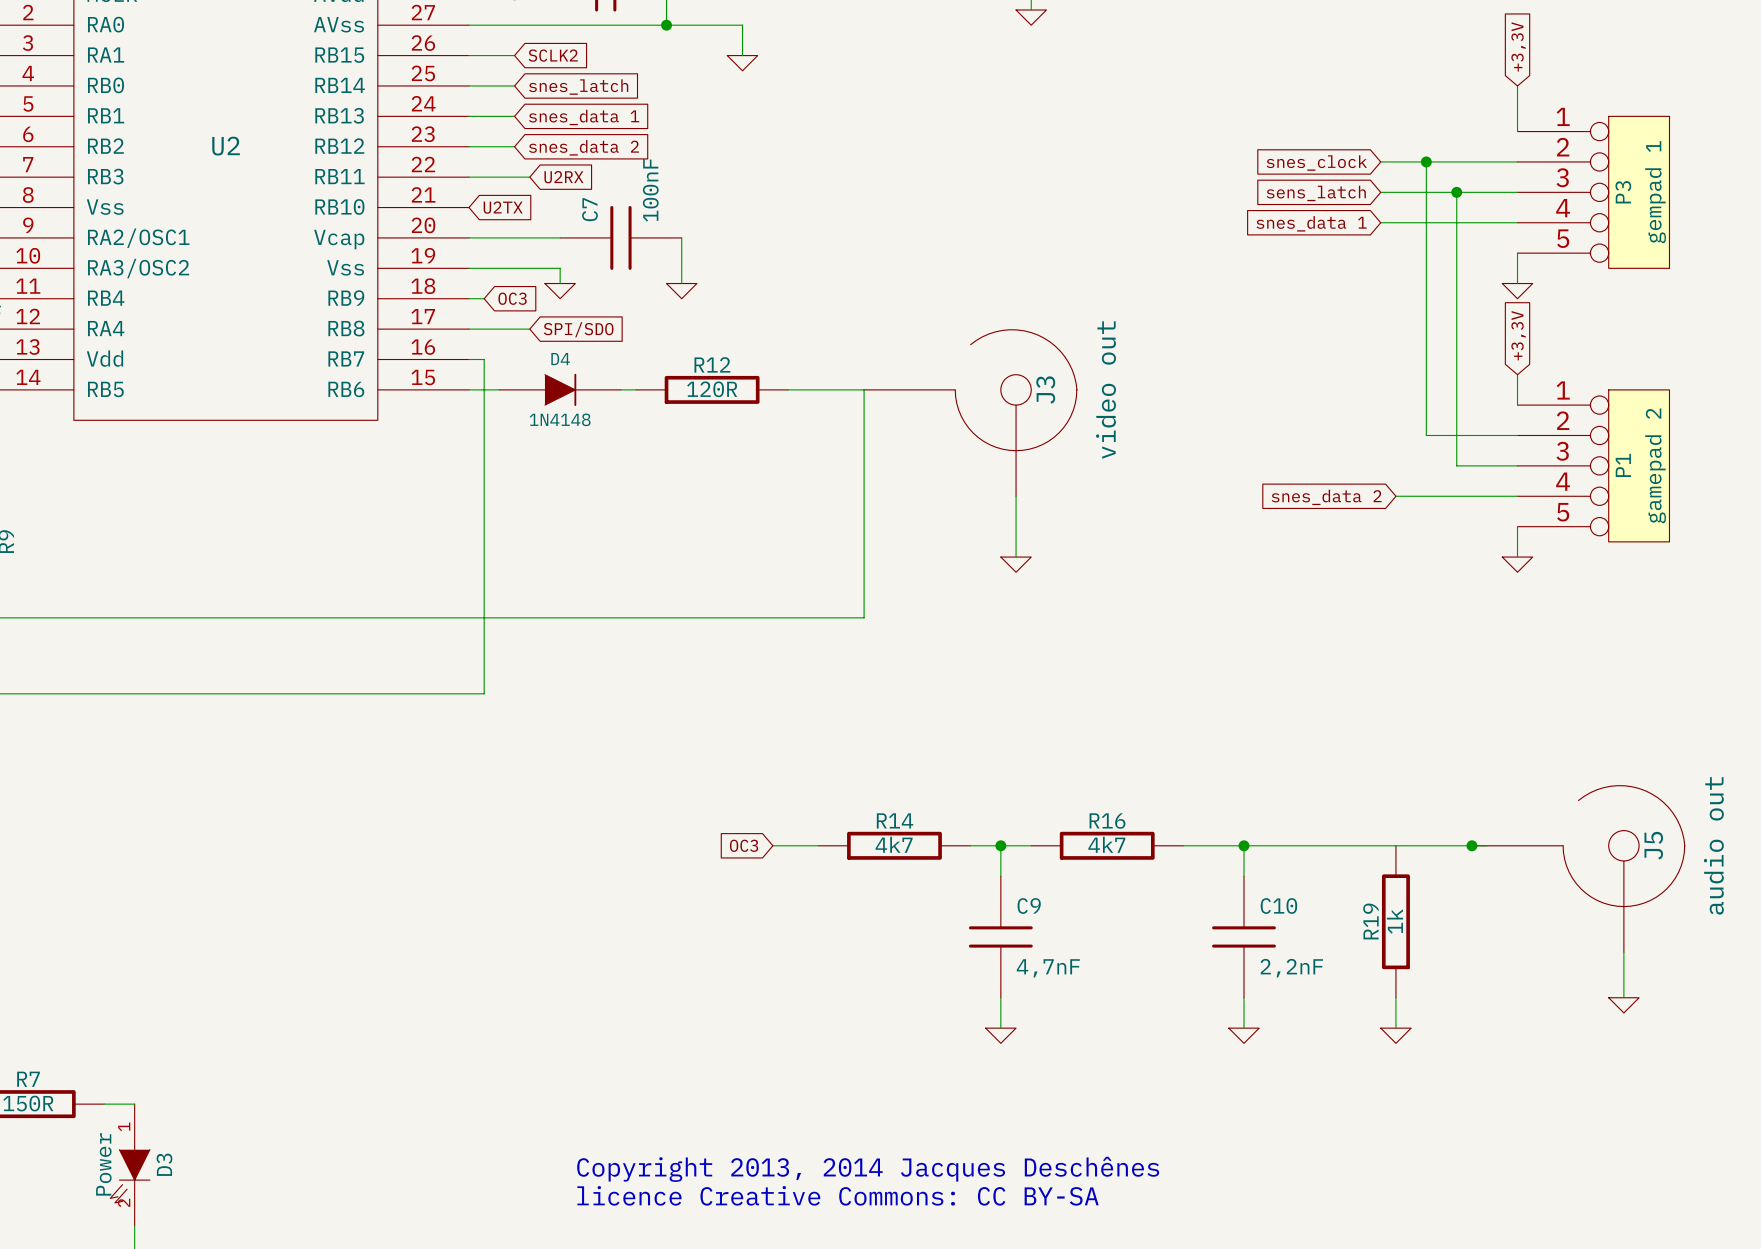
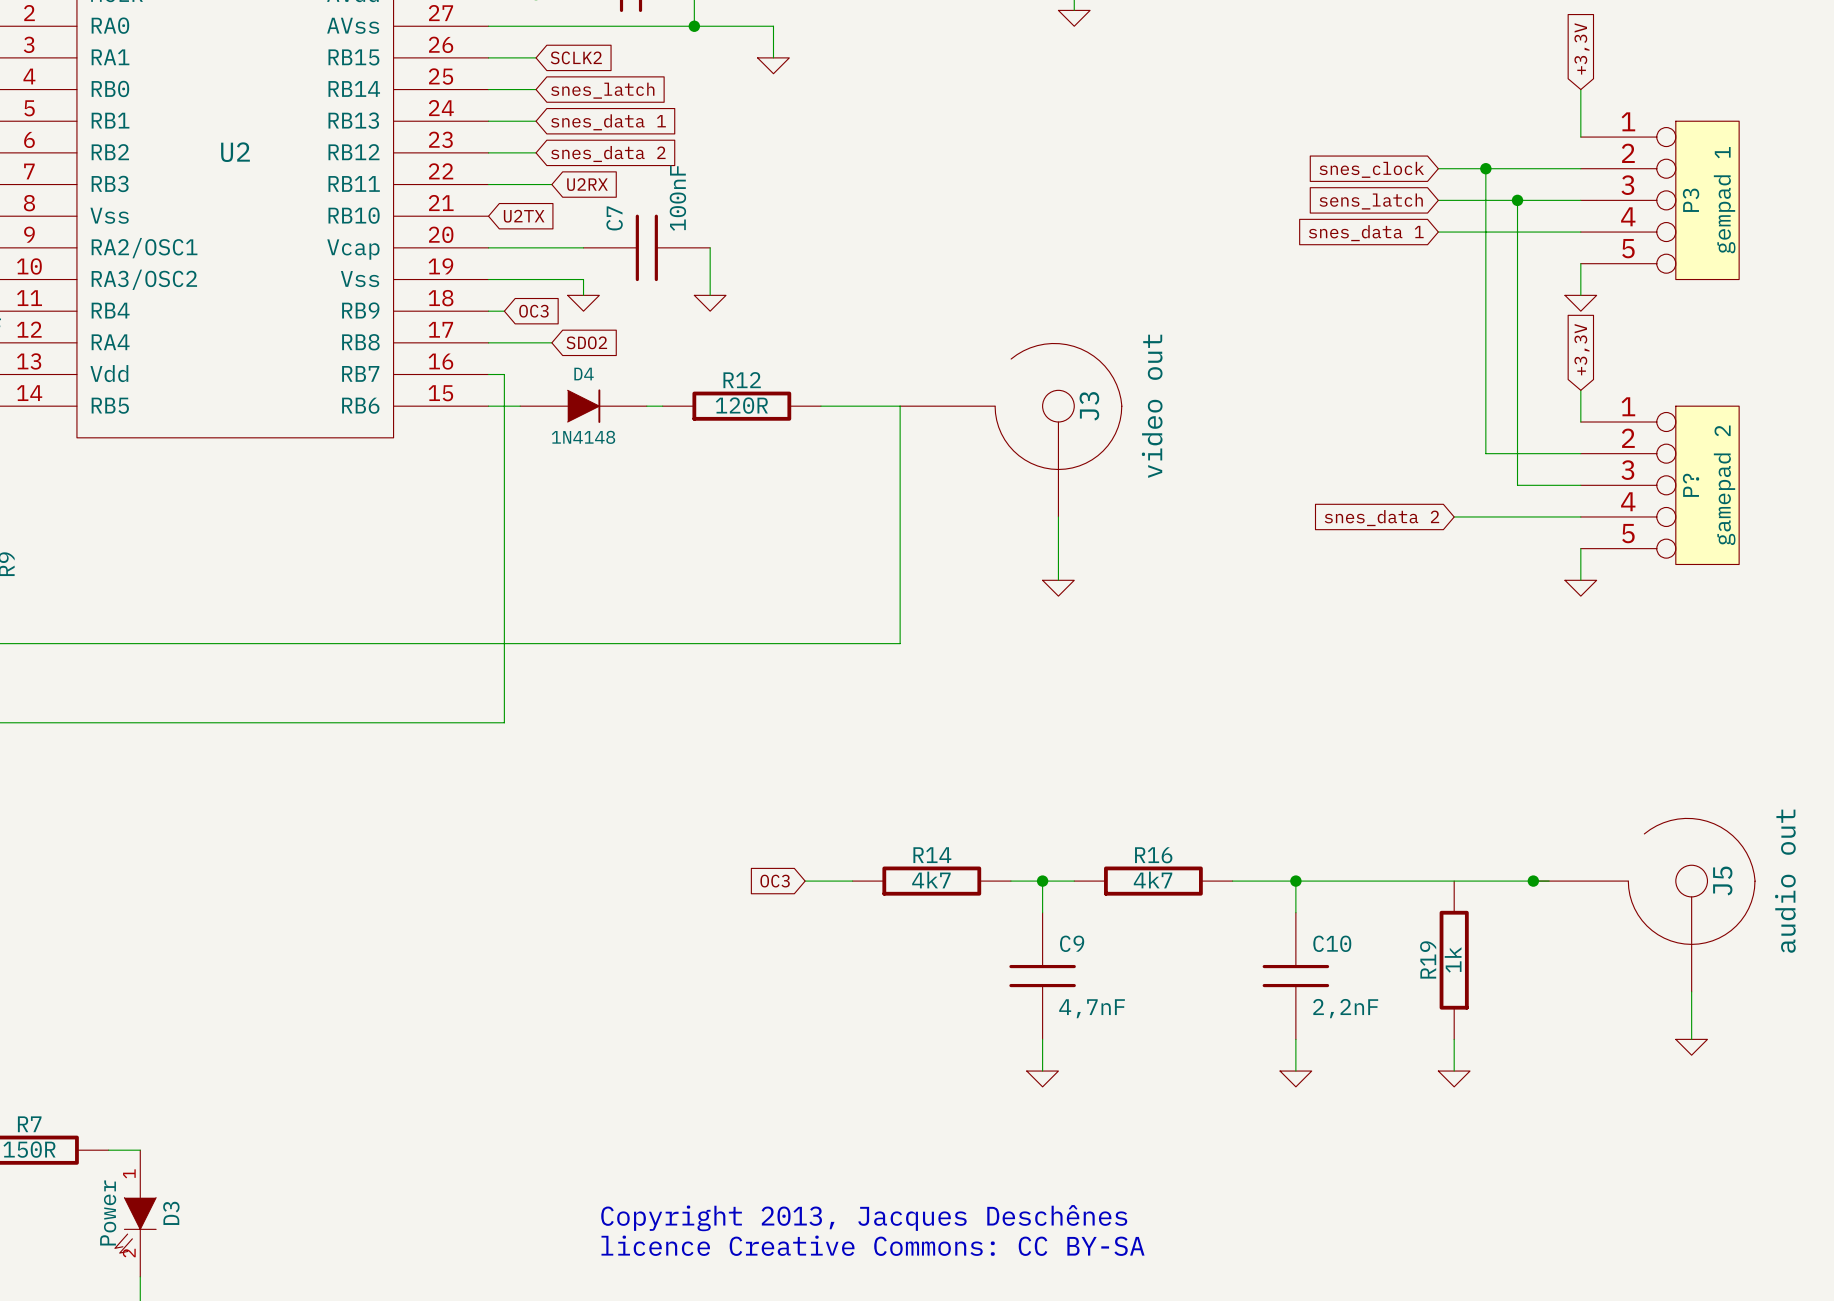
global label: SPI/SDO (578, 329) -> SDO2 (586, 342)
P1 name: P1 (1623, 465) -> P? (1691, 485)
text: Copyright 2013, 2014 Jacques Deschênes (868, 1169) -> Copyright 2013, Jacques Deschênes (864, 1218)

